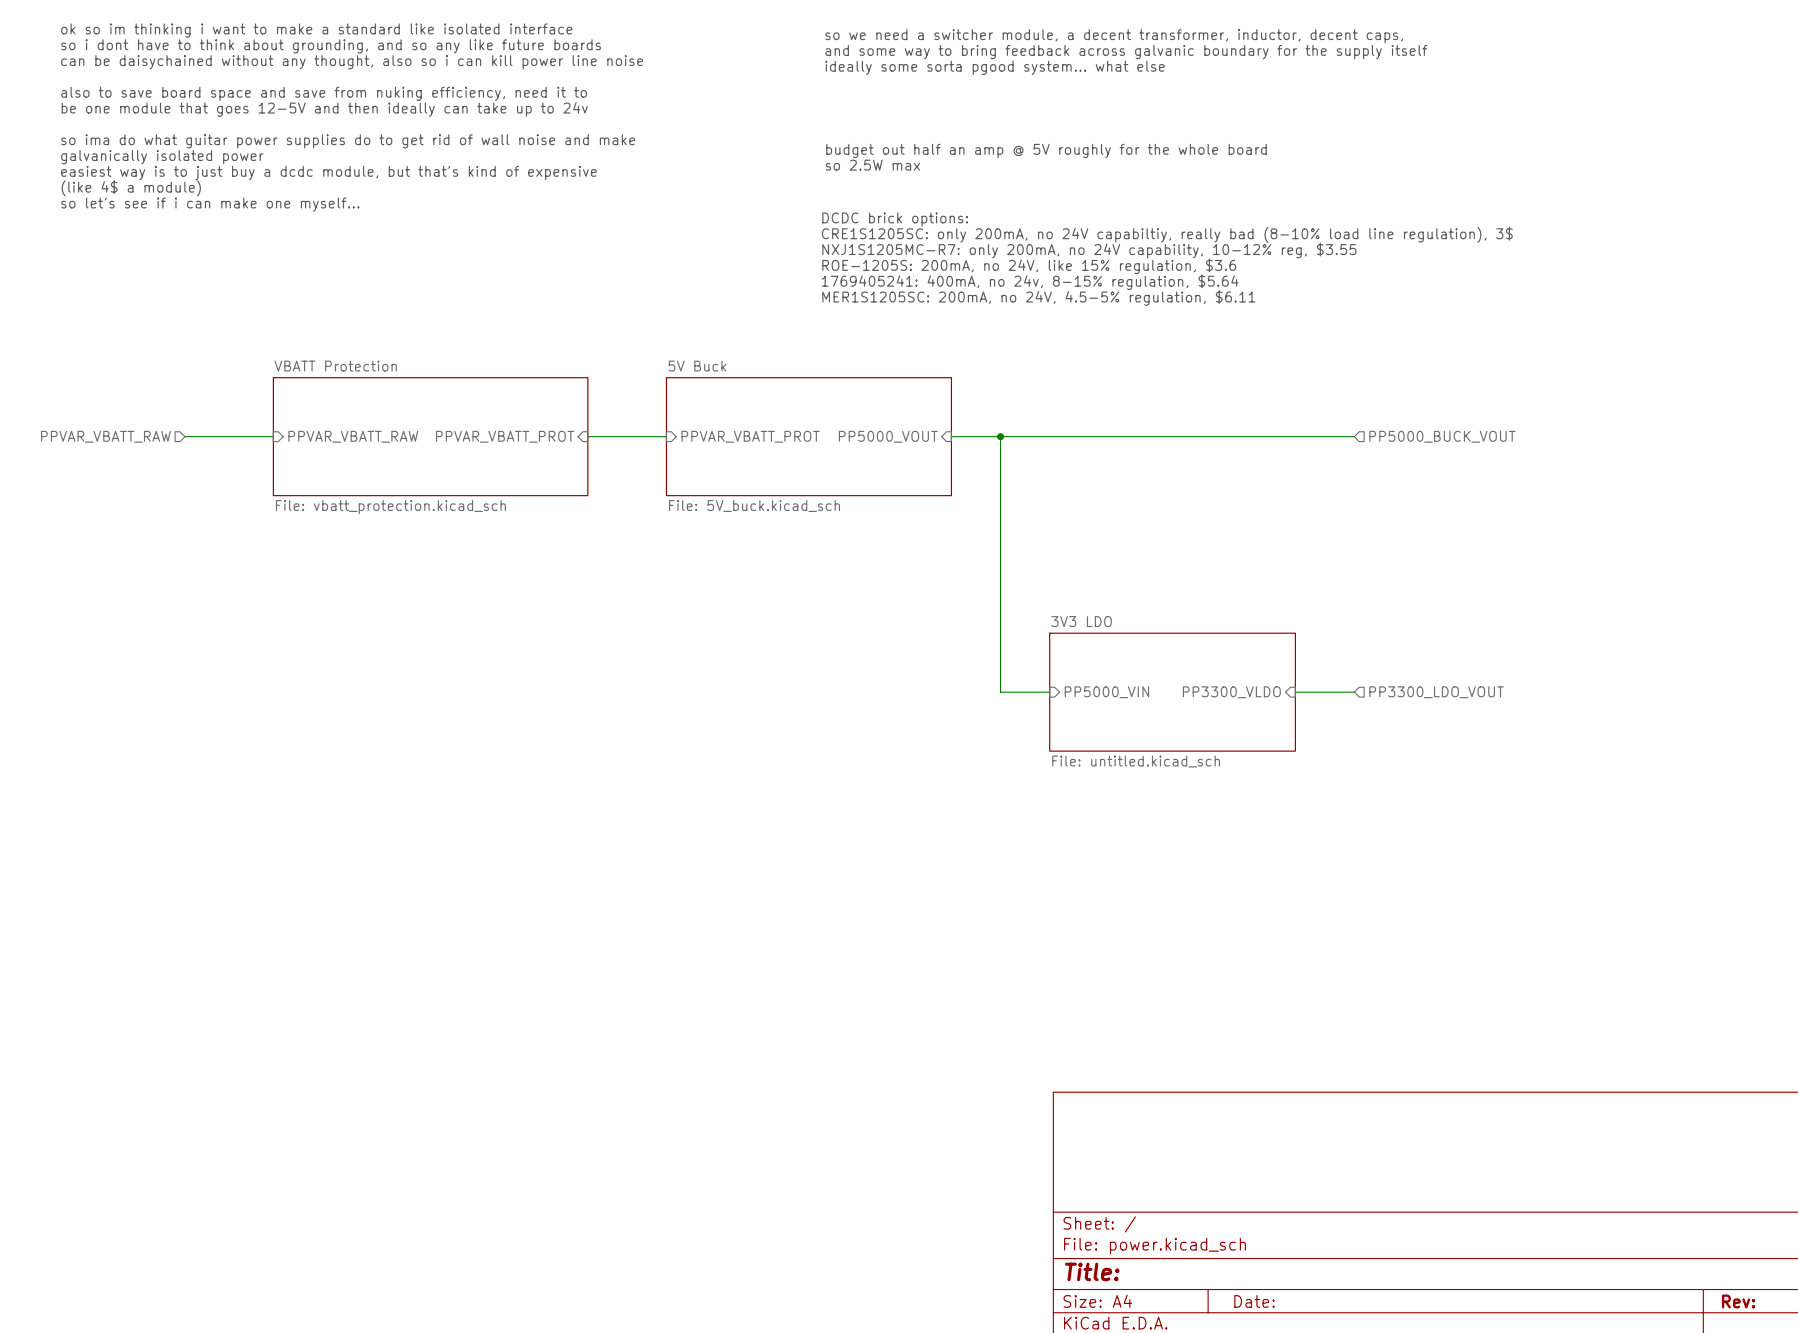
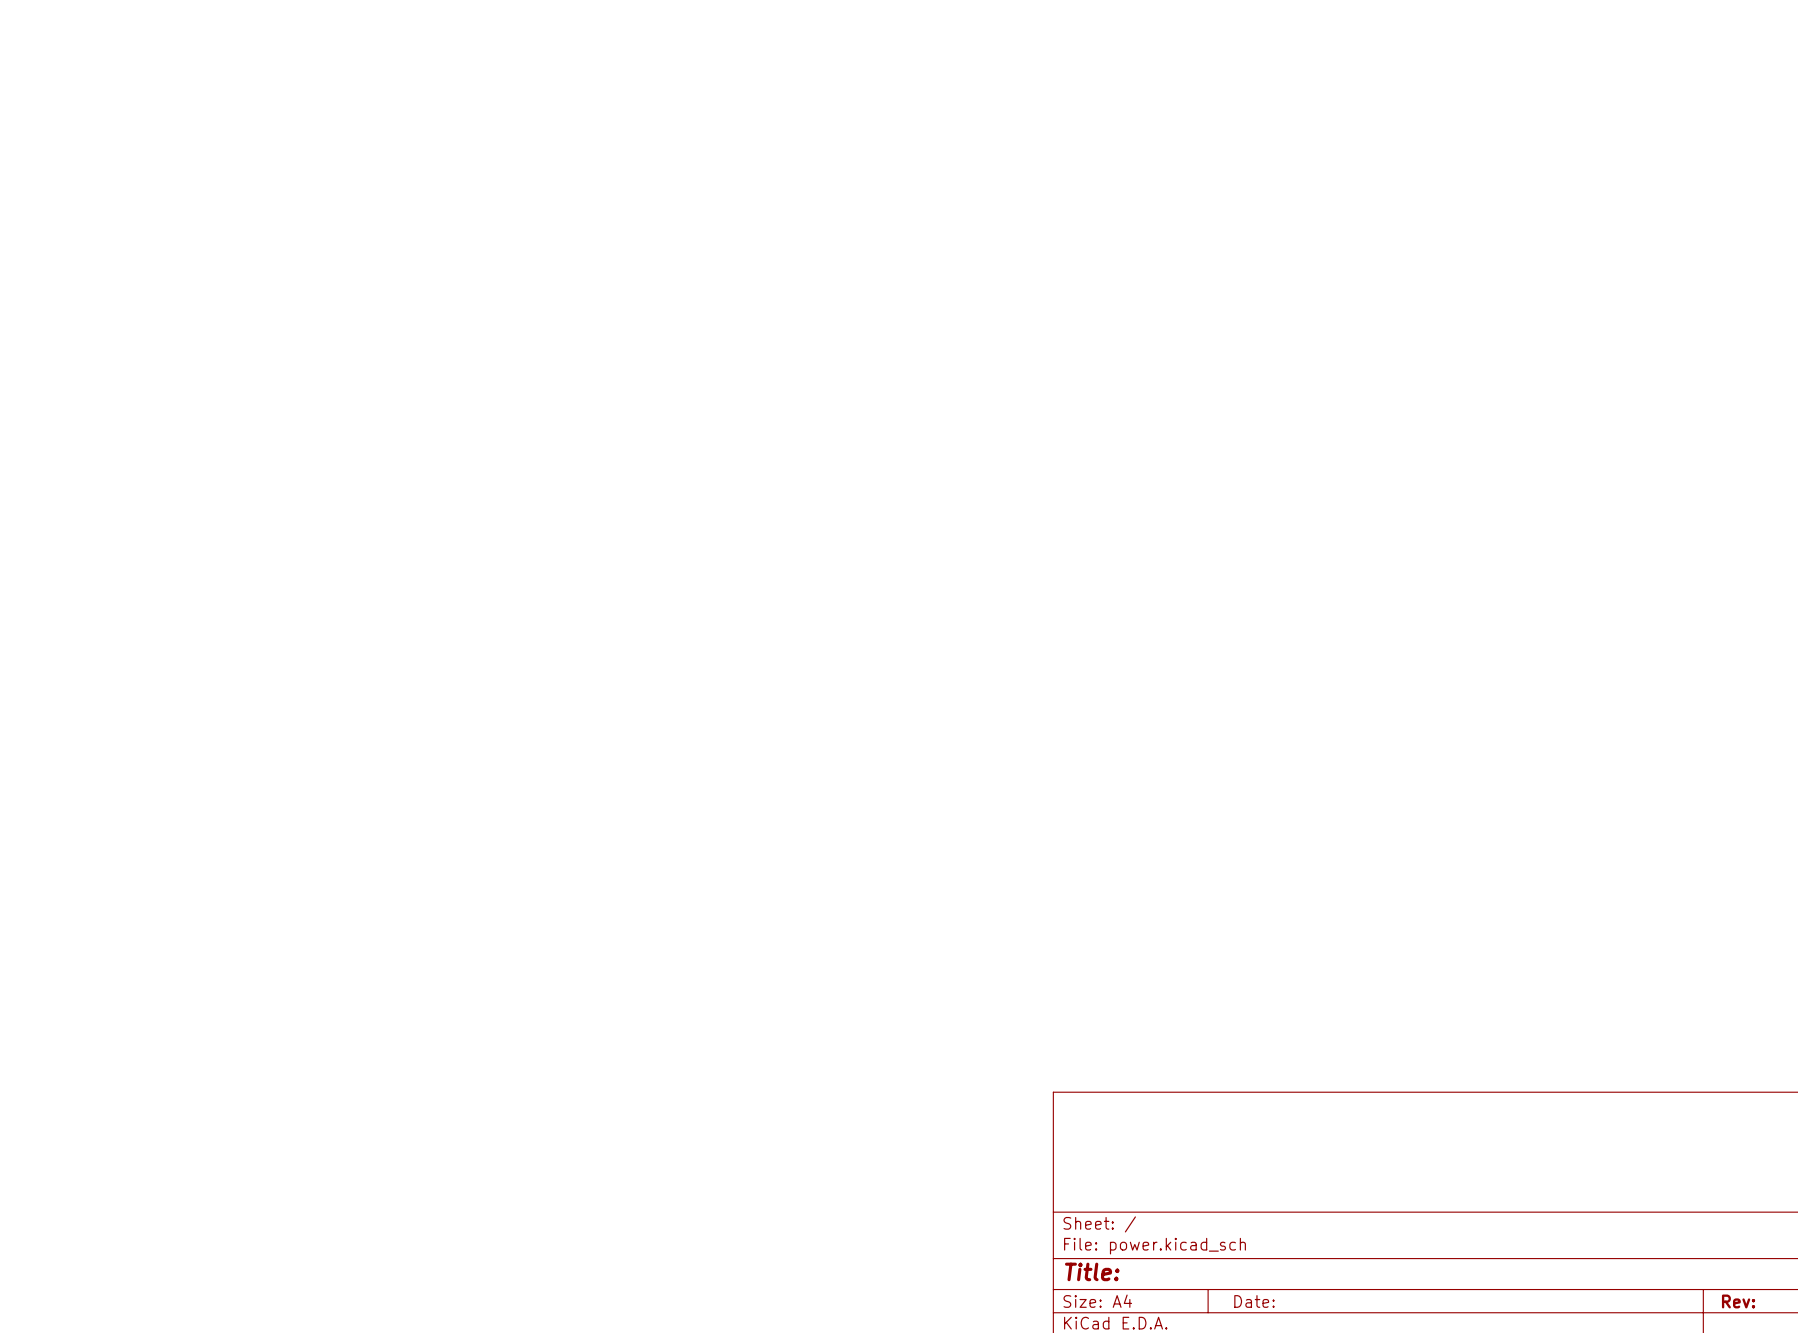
text: ok so im thinking i want to make a standard like isolated interface (316, 30) -> none
text: so we need a switcher module, a decent transformer, inductor, decent caps, (1114, 36) -> none
text: so i dont have to think about grounding, and so any like future boards (331, 46) -> none
text: and some way to bring feedback across galvanic boundary for the supply itself (1126, 52) -> none
text: can be daisychained without any thought, also so i can kill power line noise (352, 62) -> none
text: ideally some sorta pgood system... what else (995, 67) -> none
text: also to save board space and save from nuking efficiency, need it to (324, 93) -> none
text: be one module that goes 12-5V and then ideally can take up to 24v (324, 109) -> none
text: so ima do what guitar power supplies do to get rid of wall noise and make (348, 141) -> none
text: budget out half an amp @ 5V roughly for the whole board (1046, 150) -> none
text: galvanically isolated power (162, 157) -> none
text: so 2.5W max (872, 165) -> none
text: easiest way is to just buy a dcdc module, but that's kind of expensive (328, 172) -> none
text: (like 4$ a module) (131, 188) -> none
text: so let's see if i can make one myself... (210, 204) -> none
text: DCDC brick options: (895, 219) -> none
text: CRE1S1205SC: only 200mA, no 24V capabiltiy, really bad (8-10% load line regulation), 3$ (1167, 234) -> none
text: NXJ1S1205MC-R7: only 200mA, no 24V capability, 10-12% reg, $3.55 (1089, 250) -> none
text: ROE-1205S: 200mA, no 24V, like 15% regulation, $3.6 (1029, 266) -> none
text: 1769405241: 400mA, no 24v, 8-15% regulation, $5.64 (1030, 282) -> none
text: MER1S1205SC: 200mA, no 24V, 4.5-5% regulation, $6.11 (1038, 297) -> none
hierarchical label: PPVAR_VBATT_RAW (105, 436) -> none
wire: (184, 436) (273, 436) -> none
sheet pin: PPVAR_VBATT_RAW (353, 436) -> none
sheet VBATT Protection: File: vbatt_protection.kicad_sch (430, 436) -> none
sheet pin: PPVAR_VBATT_PROT (505, 436) -> none
wire: (587, 436) (666, 436) -> none
sheet pin: PPVAR_VBATT_PROT (750, 436) -> none
sheet 5V Buck: File: 5V_buck.kicad_sch (808, 436) -> none
sheet pin: PP5000_VOUT (888, 436) -> none
wire: (951, 436) (1354, 436) -> none
wire: (1000, 436) (1000, 692) (1049, 692) -> none
junction: (1000, 436) -> none
hierarchical label: PP5000_BUCK_VOUT (1442, 436) -> none
sheet pin: PP5000_VIN (1106, 692) -> none
sheet 3V3 LDO: File: untitled.kicad_sch (1172, 692) -> none
sheet pin: PP3300_VLDO (1231, 692) -> none
wire: (1295, 692) (1354, 692) -> none
hierarchical label: PP3300_LDO_VOUT (1436, 692) -> none

